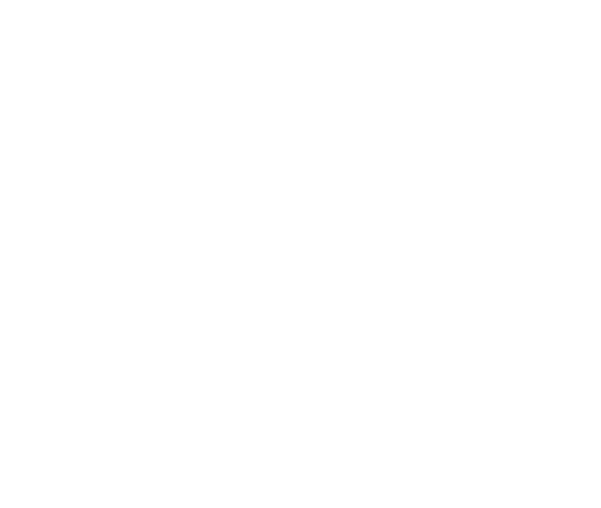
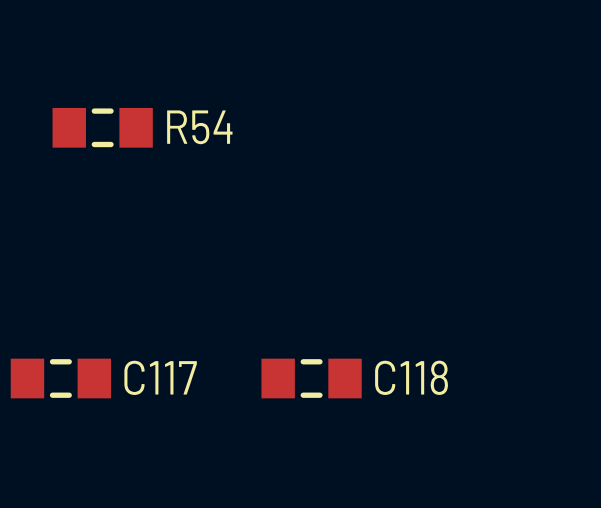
R54: none -> (102, 127)
C117: none -> (60, 378)
C118: none -> (311, 378)

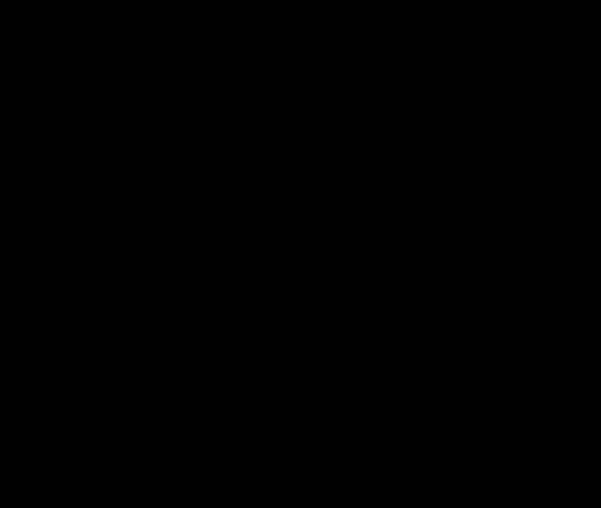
R54: (102, 127) -> none
C117: (60, 378) -> none
C118: (311, 378) -> none

